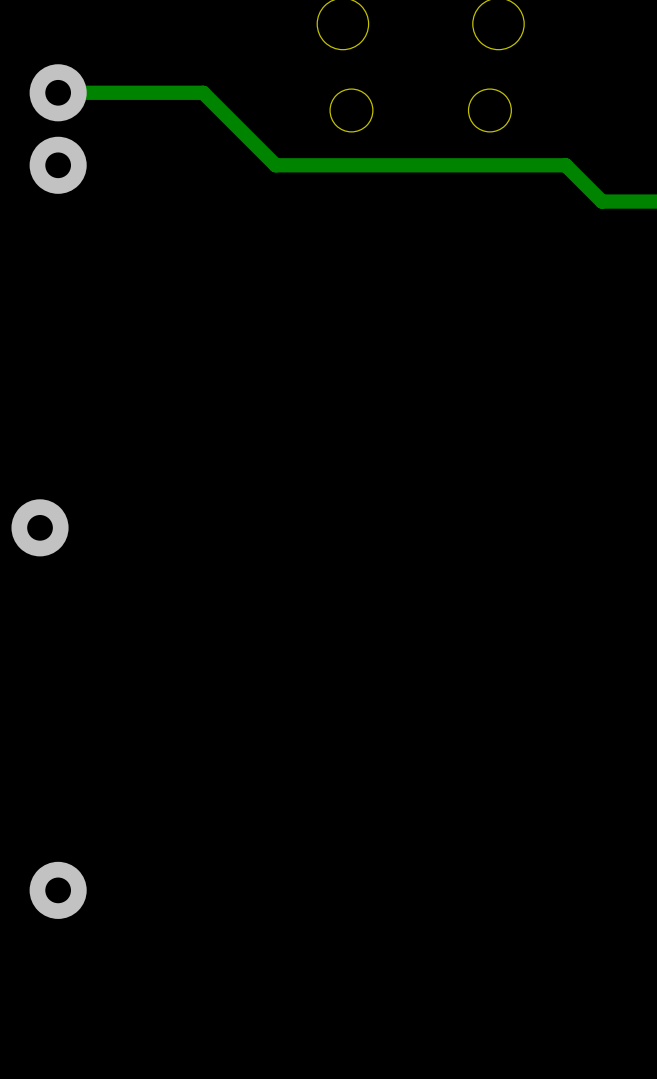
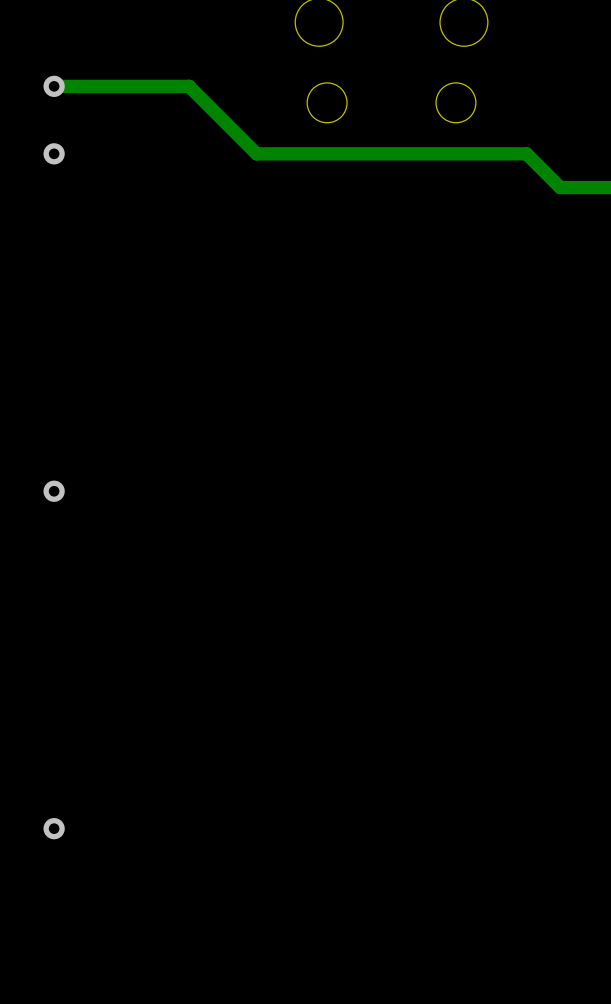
via size: [29, 64, 87, 122] -> [43, 75, 65, 97]
via size: [29, 136, 87, 194] -> [43, 143, 65, 165]
via size: [11, 499, 69, 557] -> [43, 480, 65, 502]
via size: [29, 861, 87, 919] -> [43, 818, 65, 840]

